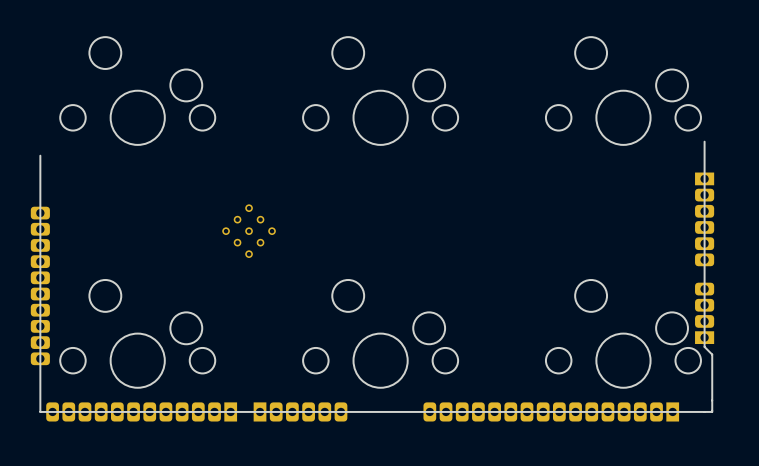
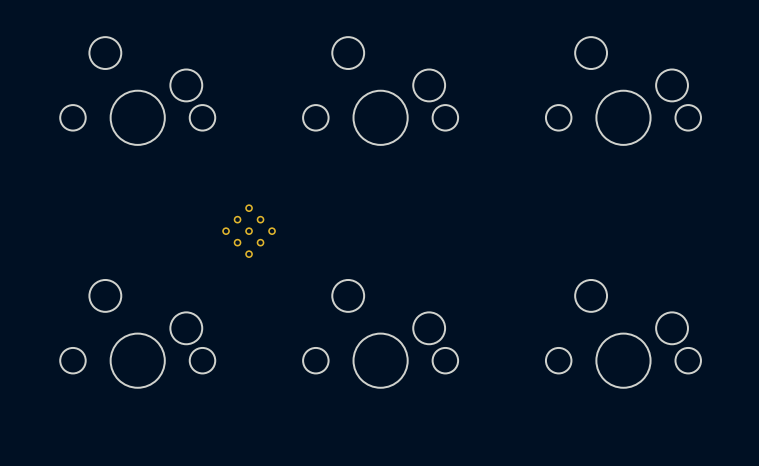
board edge: (704, 141) (704, 346) (712, 354) (712, 411) (40, 411) (40, 155) -> none
part: (704, 219) -> none
part: (40, 285) -> none
part: (704, 313) -> none
part: (141, 411) -> none
part: (300, 411) -> none
part: (551, 411) -> none

